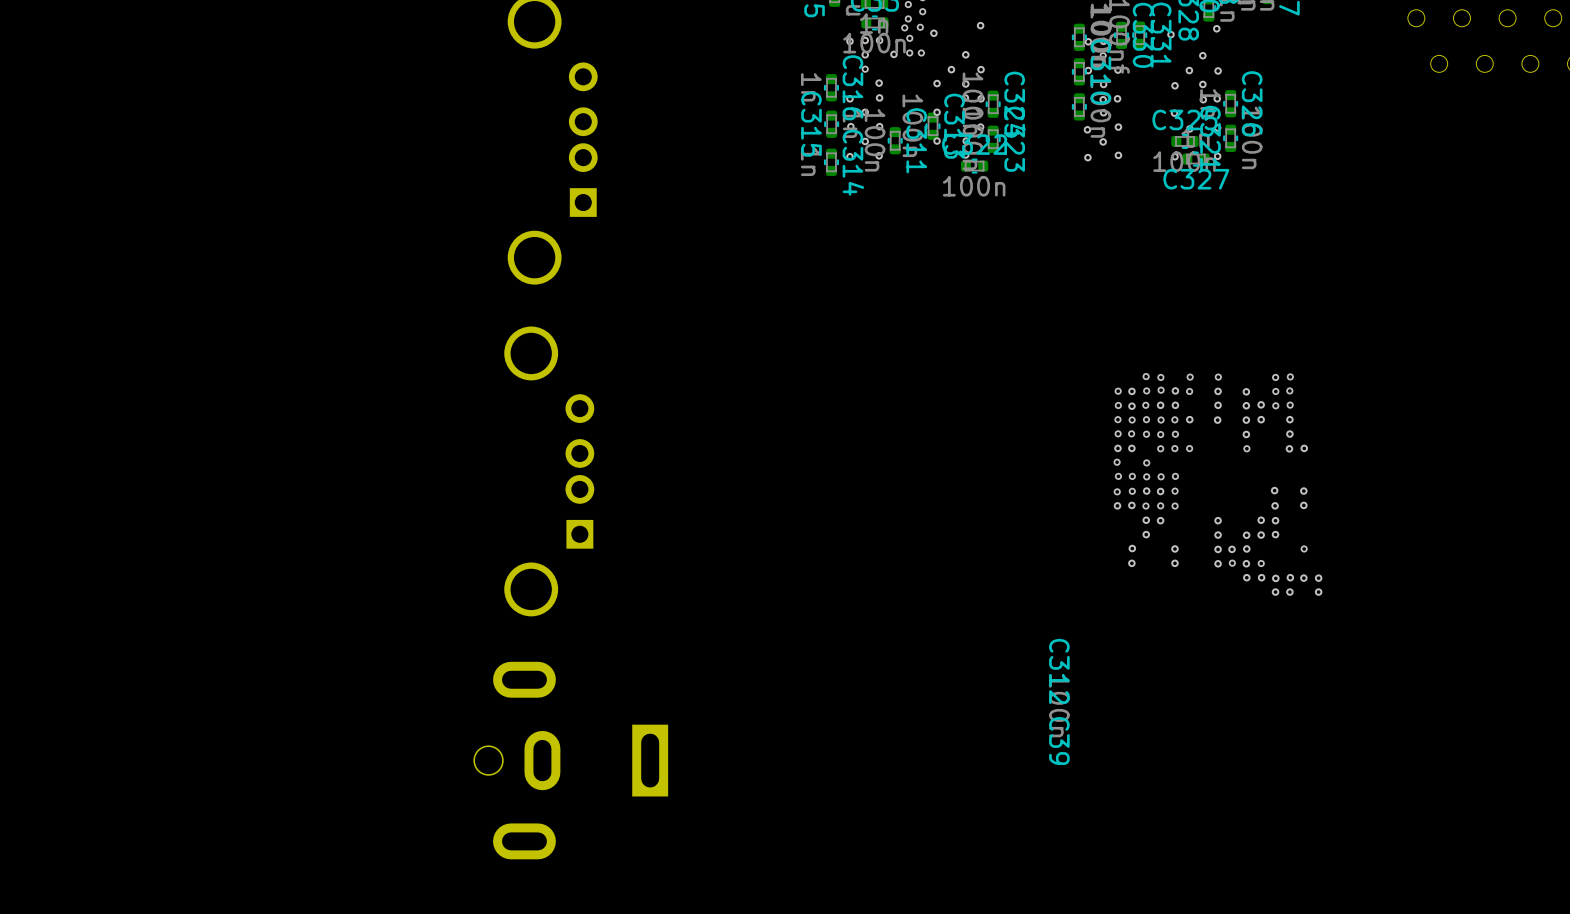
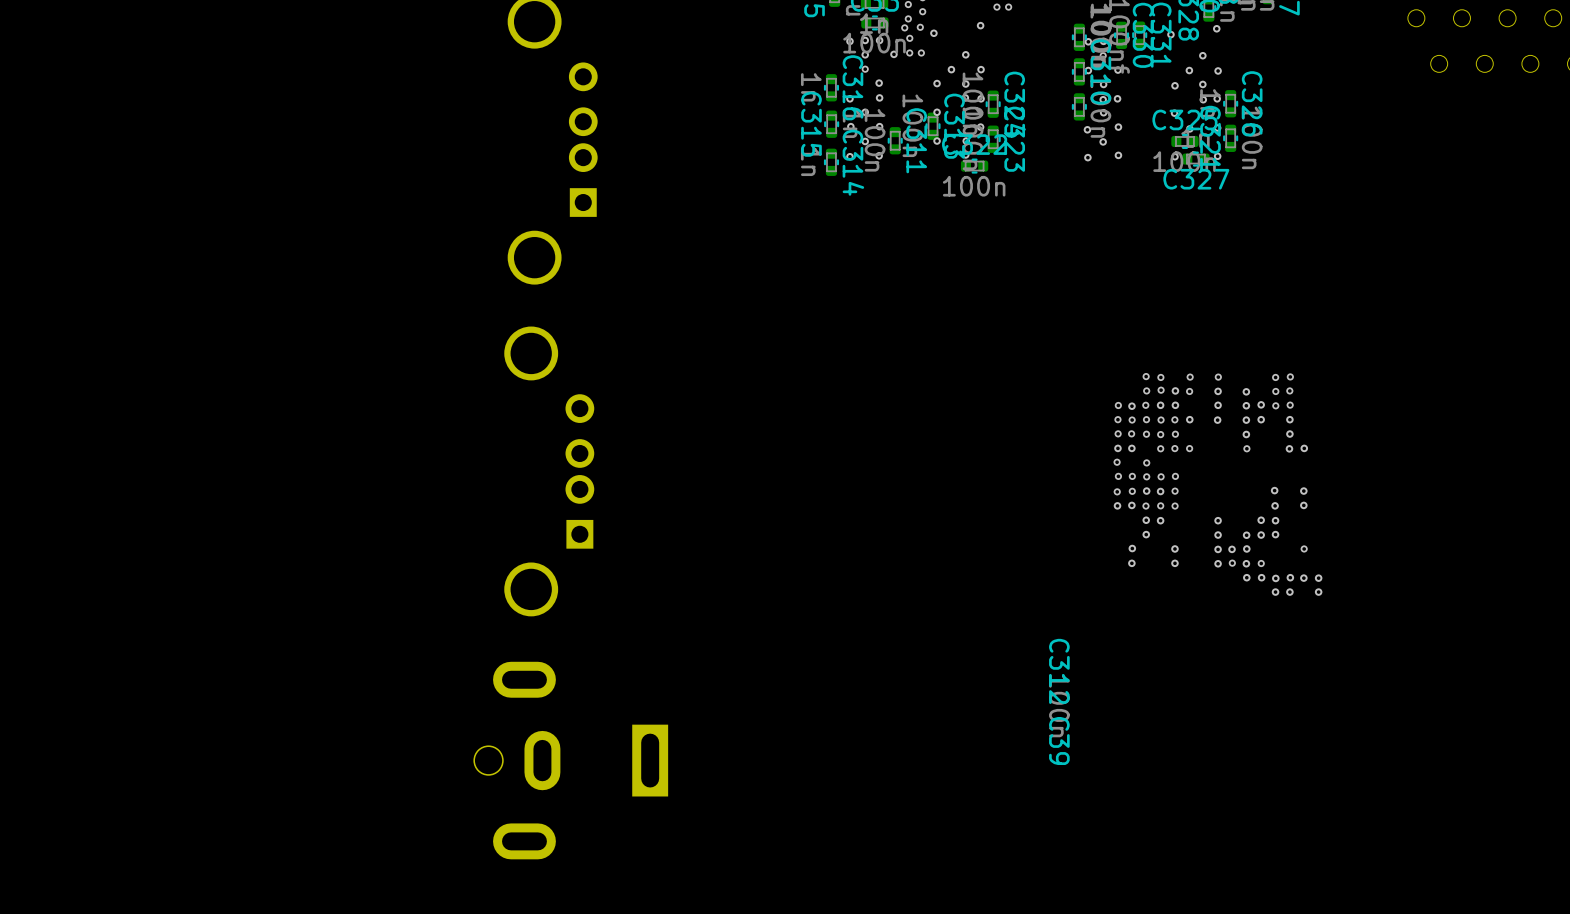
via: none -> (996, 7)
via: none -> (1008, 7)
via: (1118, 391) -> none
via: (1131, 391) -> none

